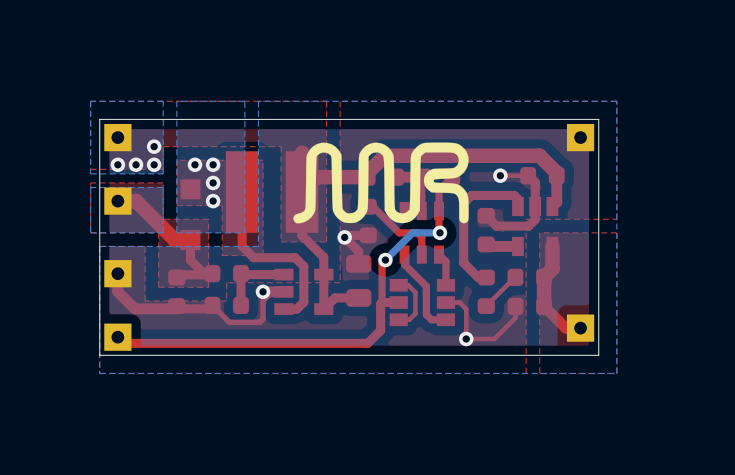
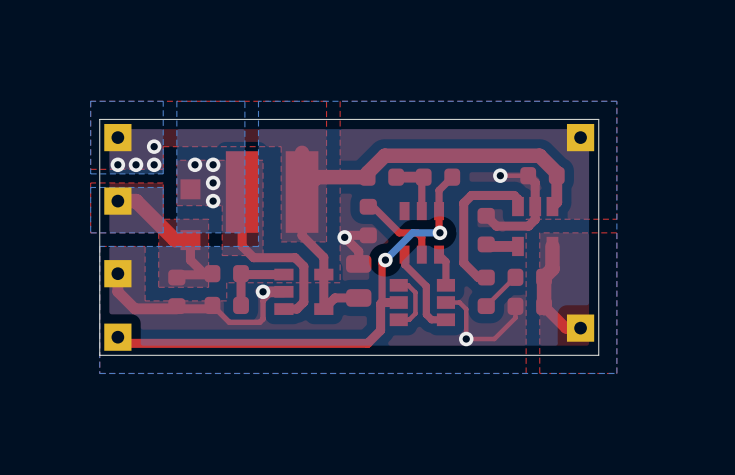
drawing: [293, 142, 469, 224] -> none

